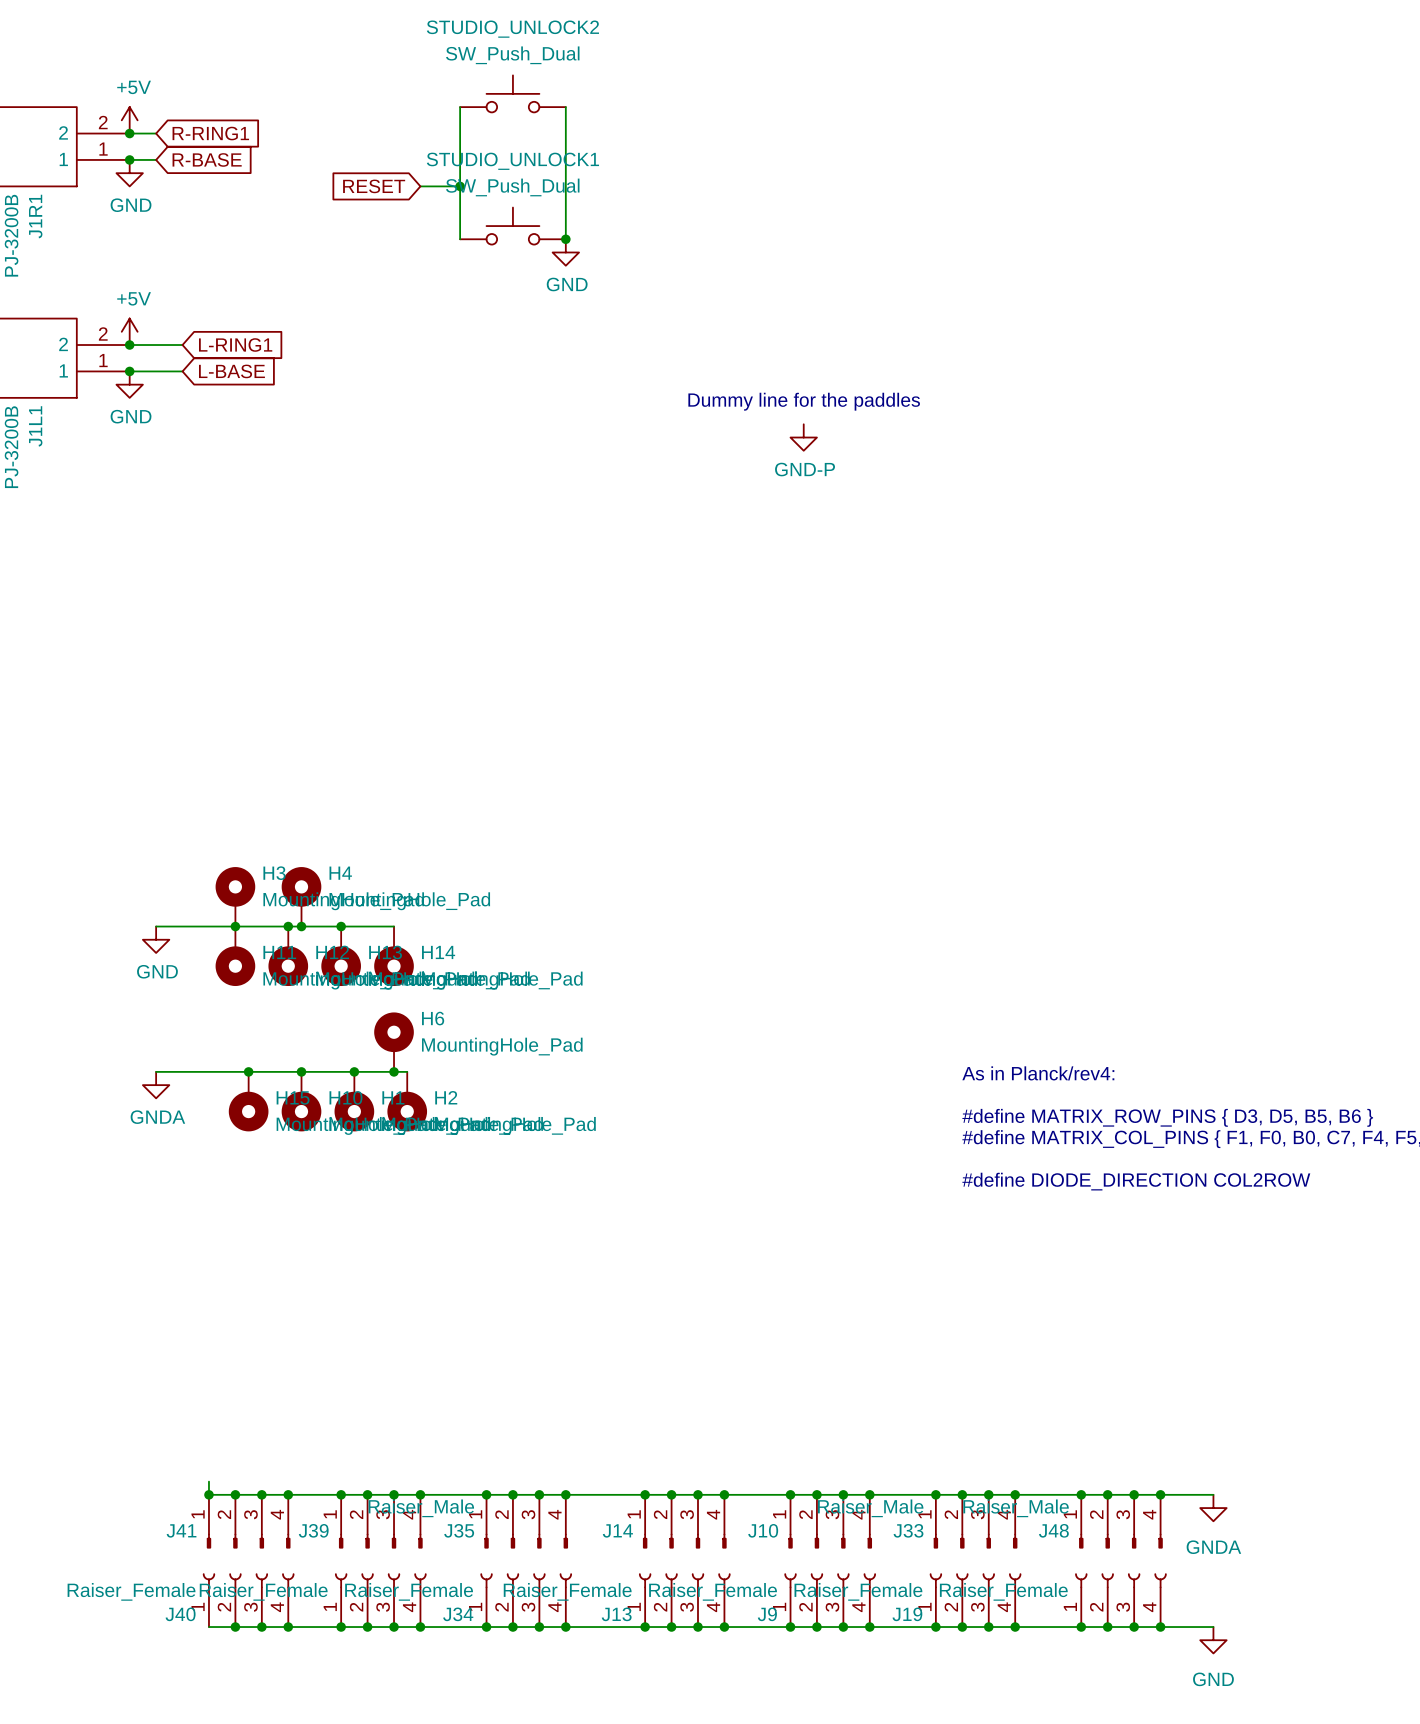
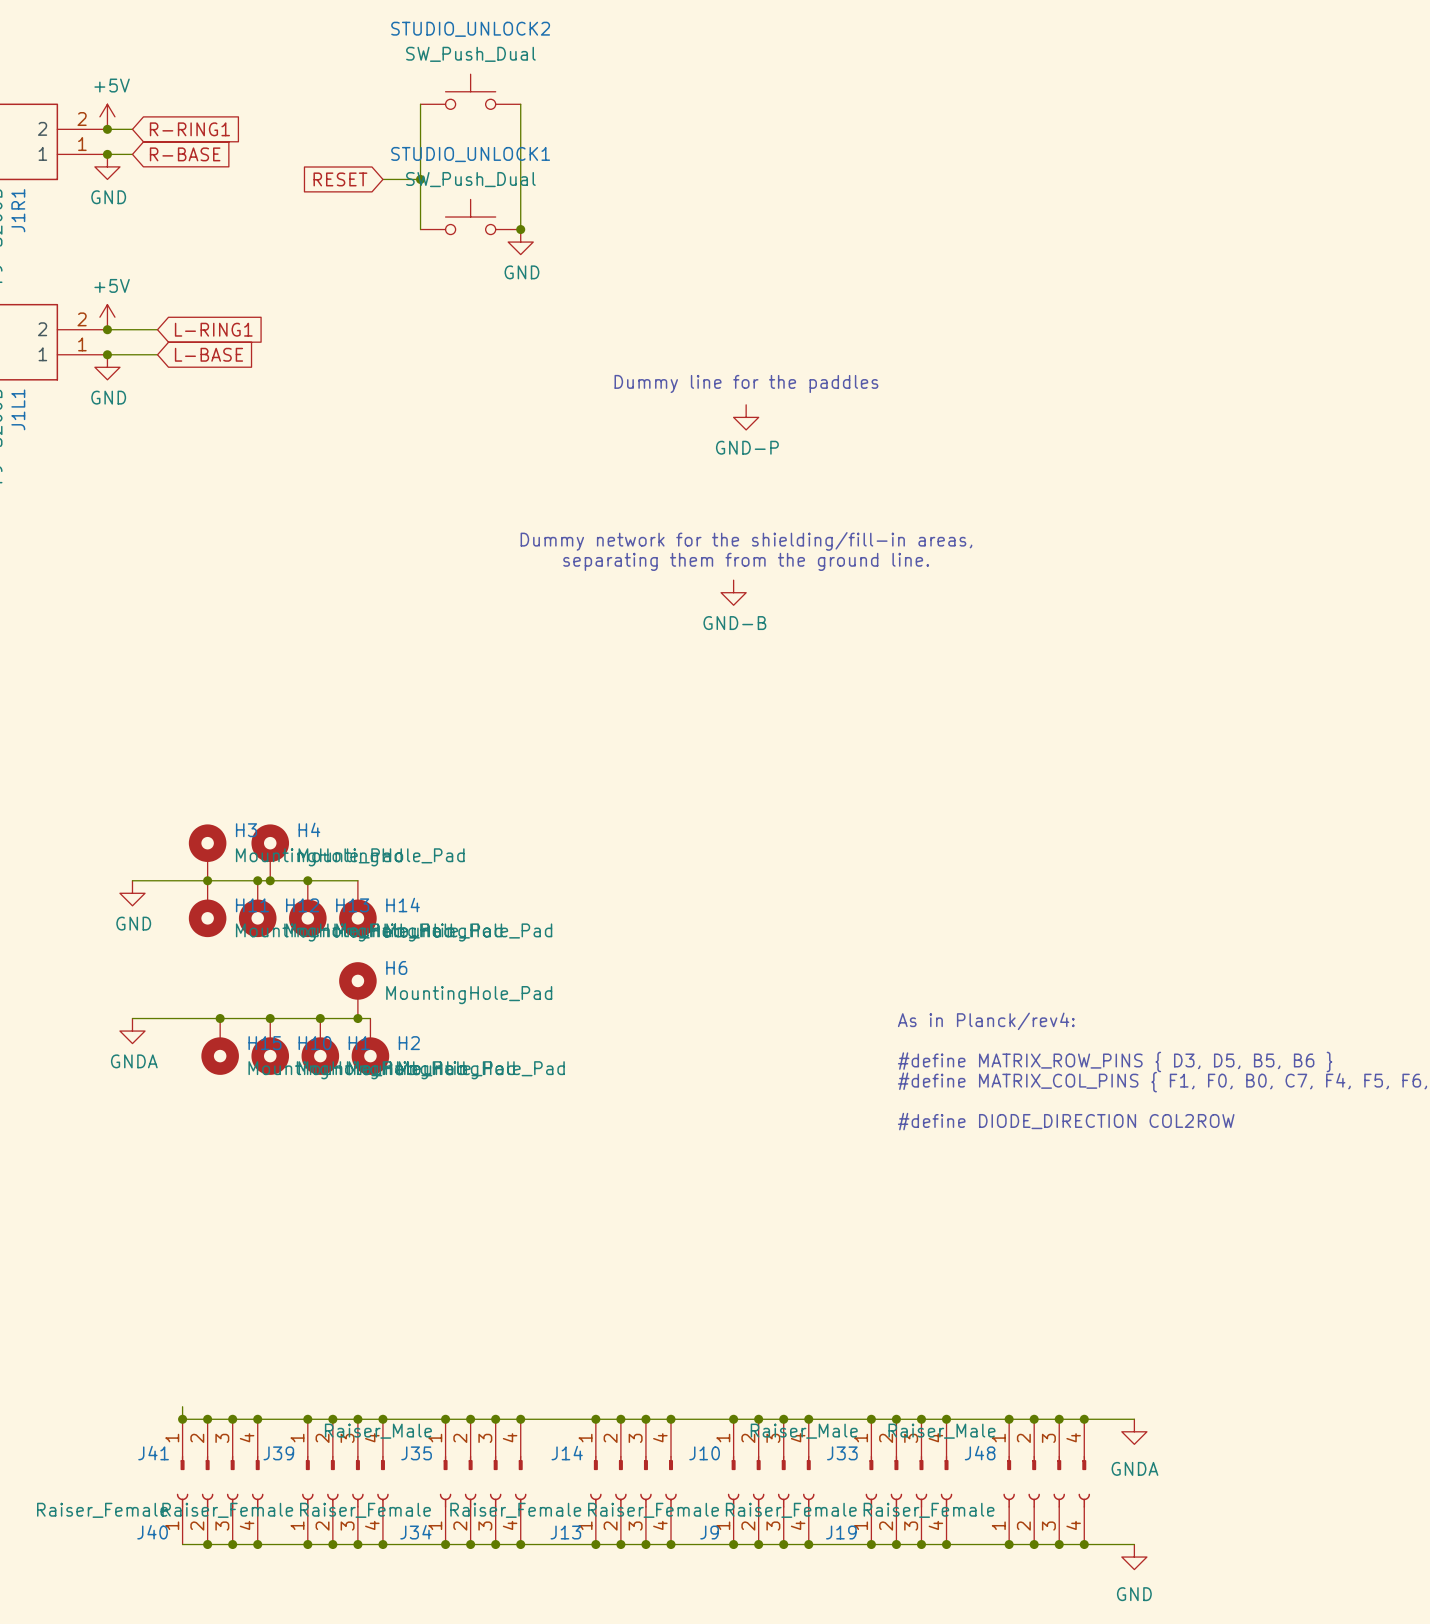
text: none -> Dummy network for the shielding/fill-in areas, (746, 541)
text: none -> separating them from the ground line. (746, 561)
power symbol: none -> GND-B (733, 592)

